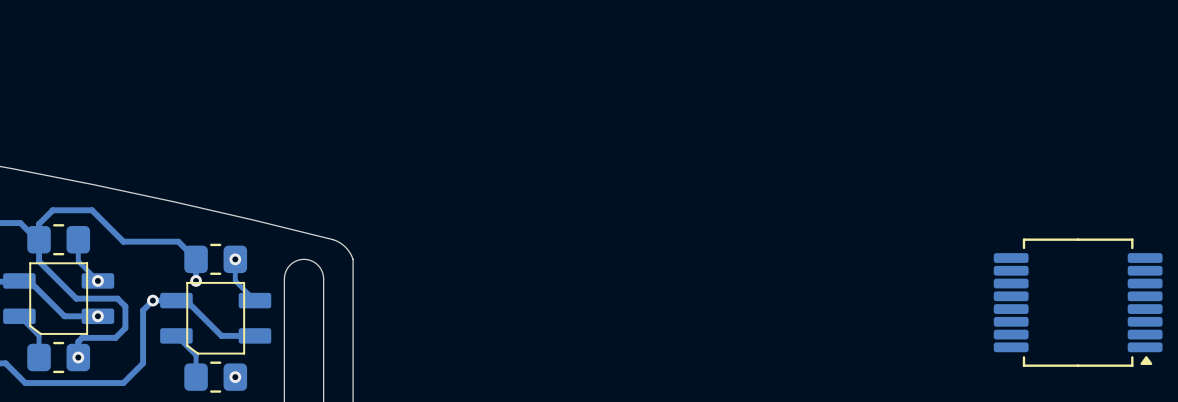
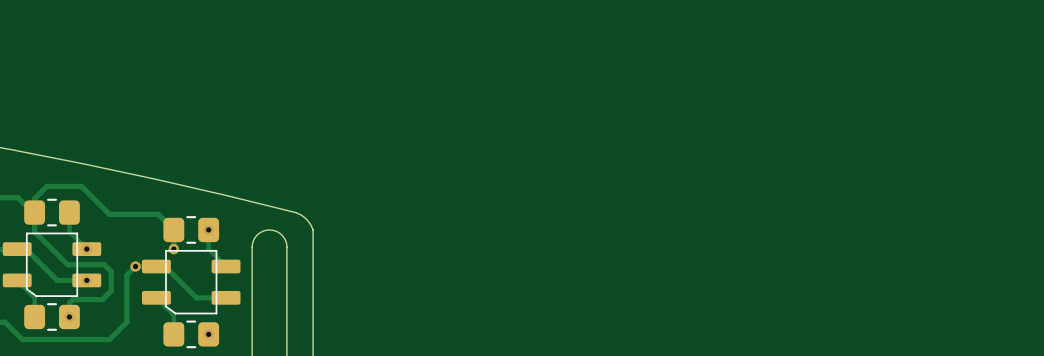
part: (1078, 302) -> none

